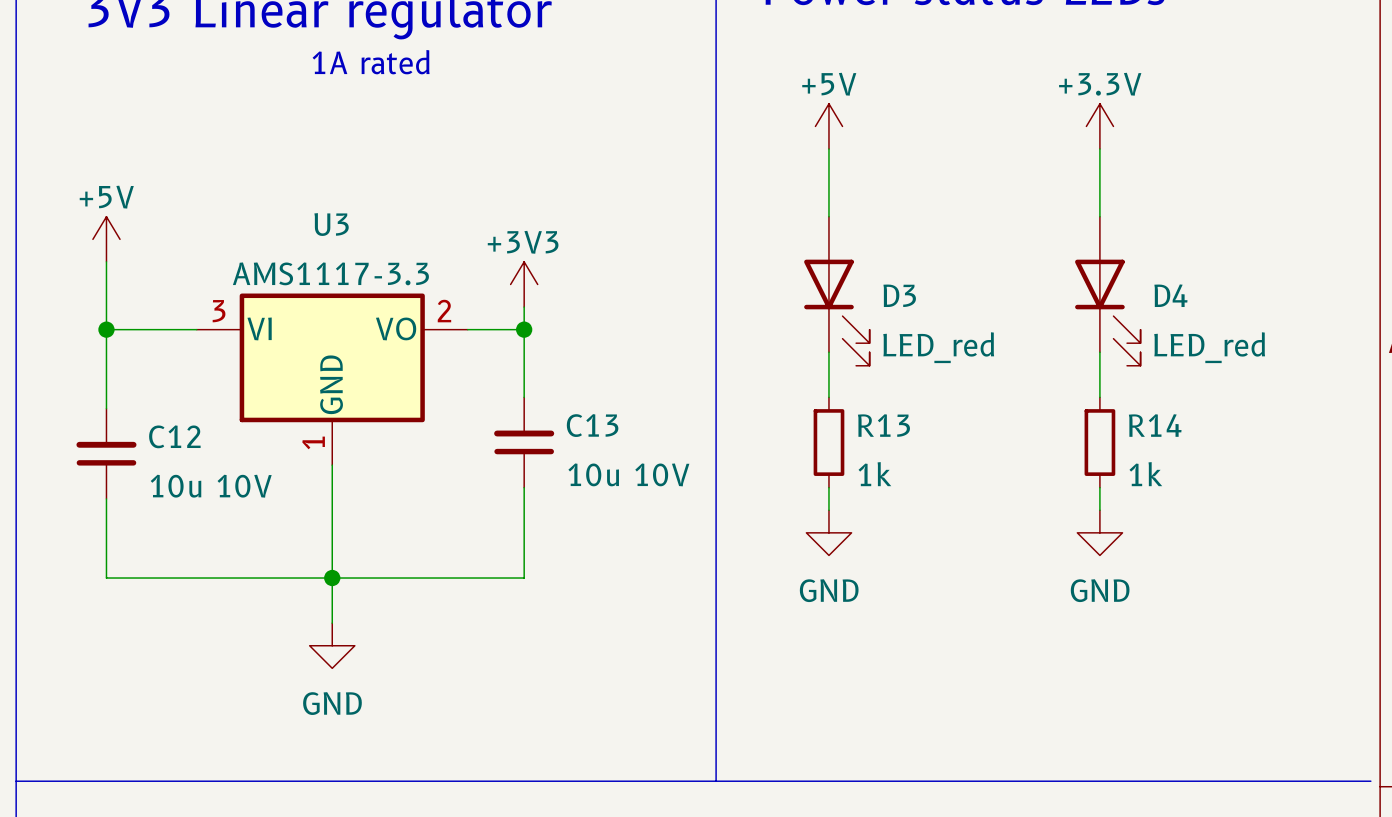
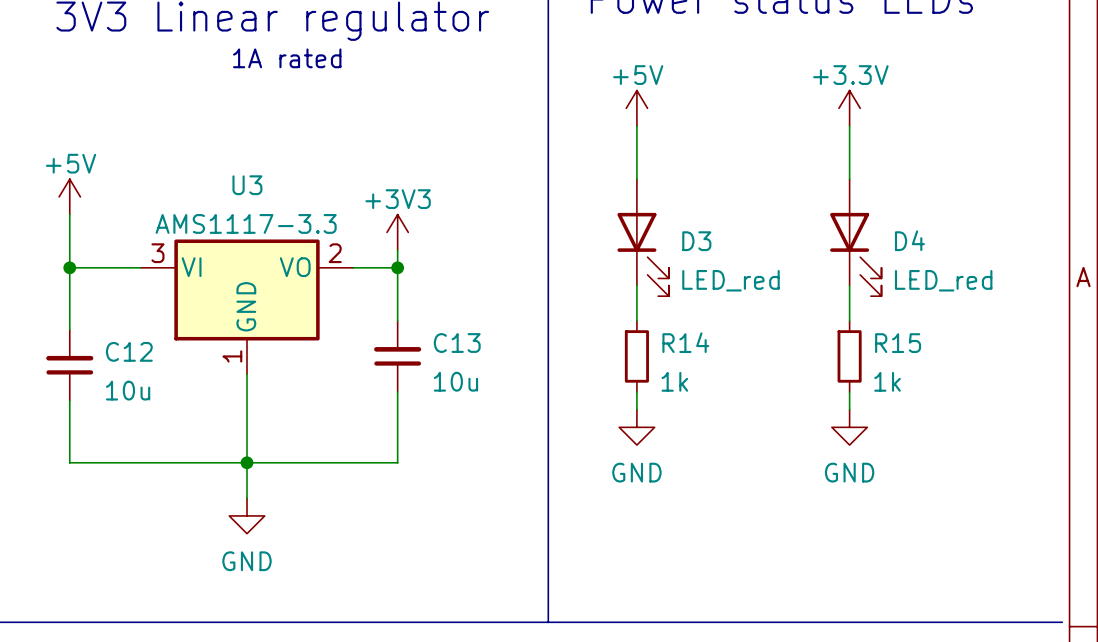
R13 name: R13 (883, 425) -> R14 (685, 342)
R14 name: R14 (1155, 425) -> R15 (898, 343)
C13 value: 10u 10V (628, 474) -> 10u (455, 381)
C12 value: 10u 10V (211, 486) -> 10u (128, 390)

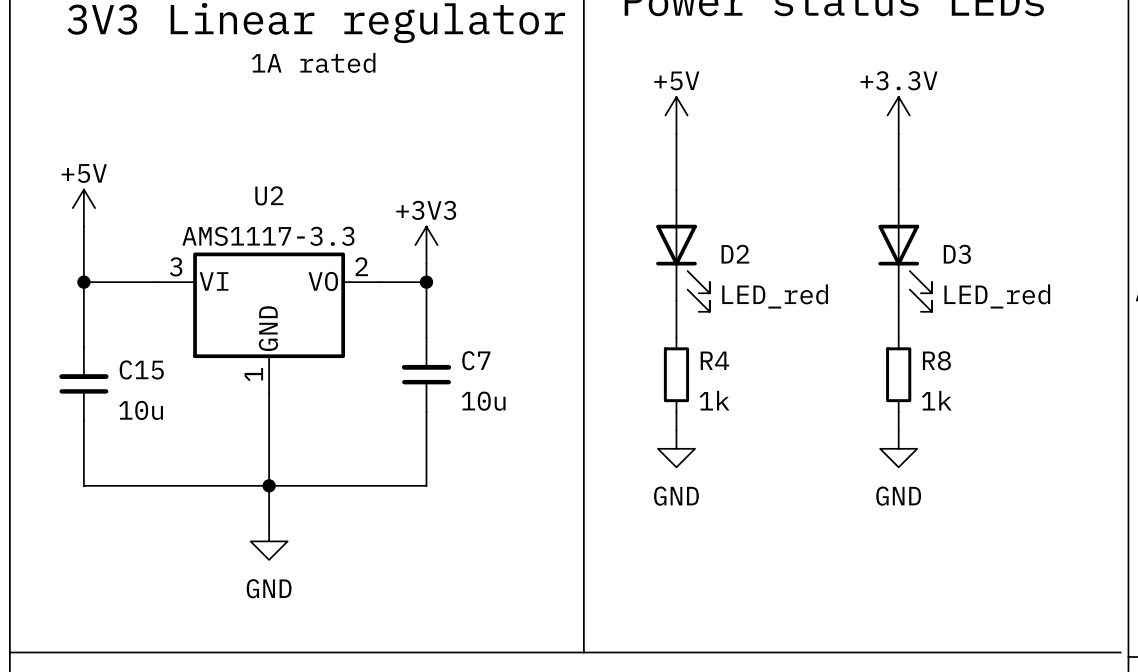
U3 name: U3 (247, 185) -> U2 (269, 195)
D4 name: D4 (909, 240) -> D3 (957, 254)
D3 name: D3 (696, 241) -> D2 (735, 254)
R14 name: R14 (685, 342) -> R4 (714, 360)
C13 name: C13 (457, 343) -> C7 (476, 360)
R15 name: R15 (898, 343) -> R8 (936, 360)
C12 name: C12 (129, 351) -> C15 (141, 369)

